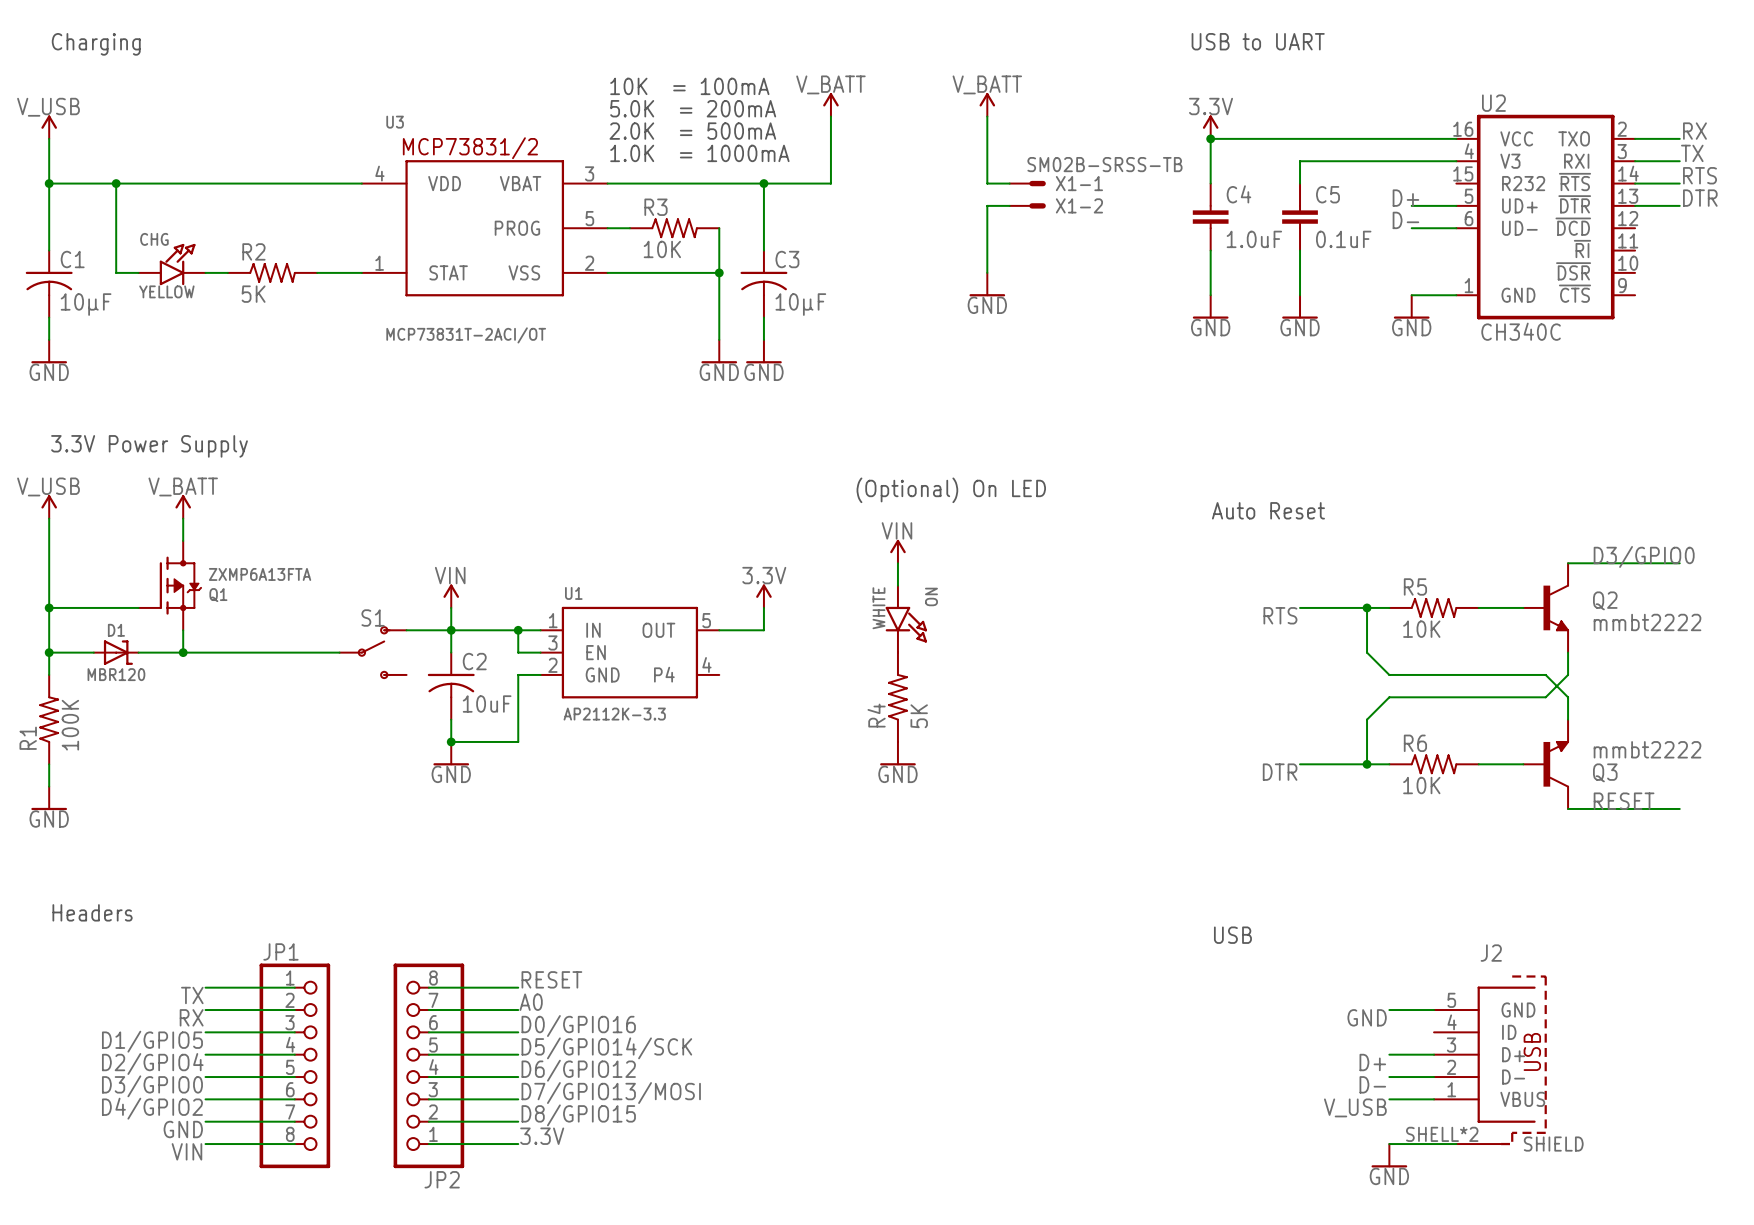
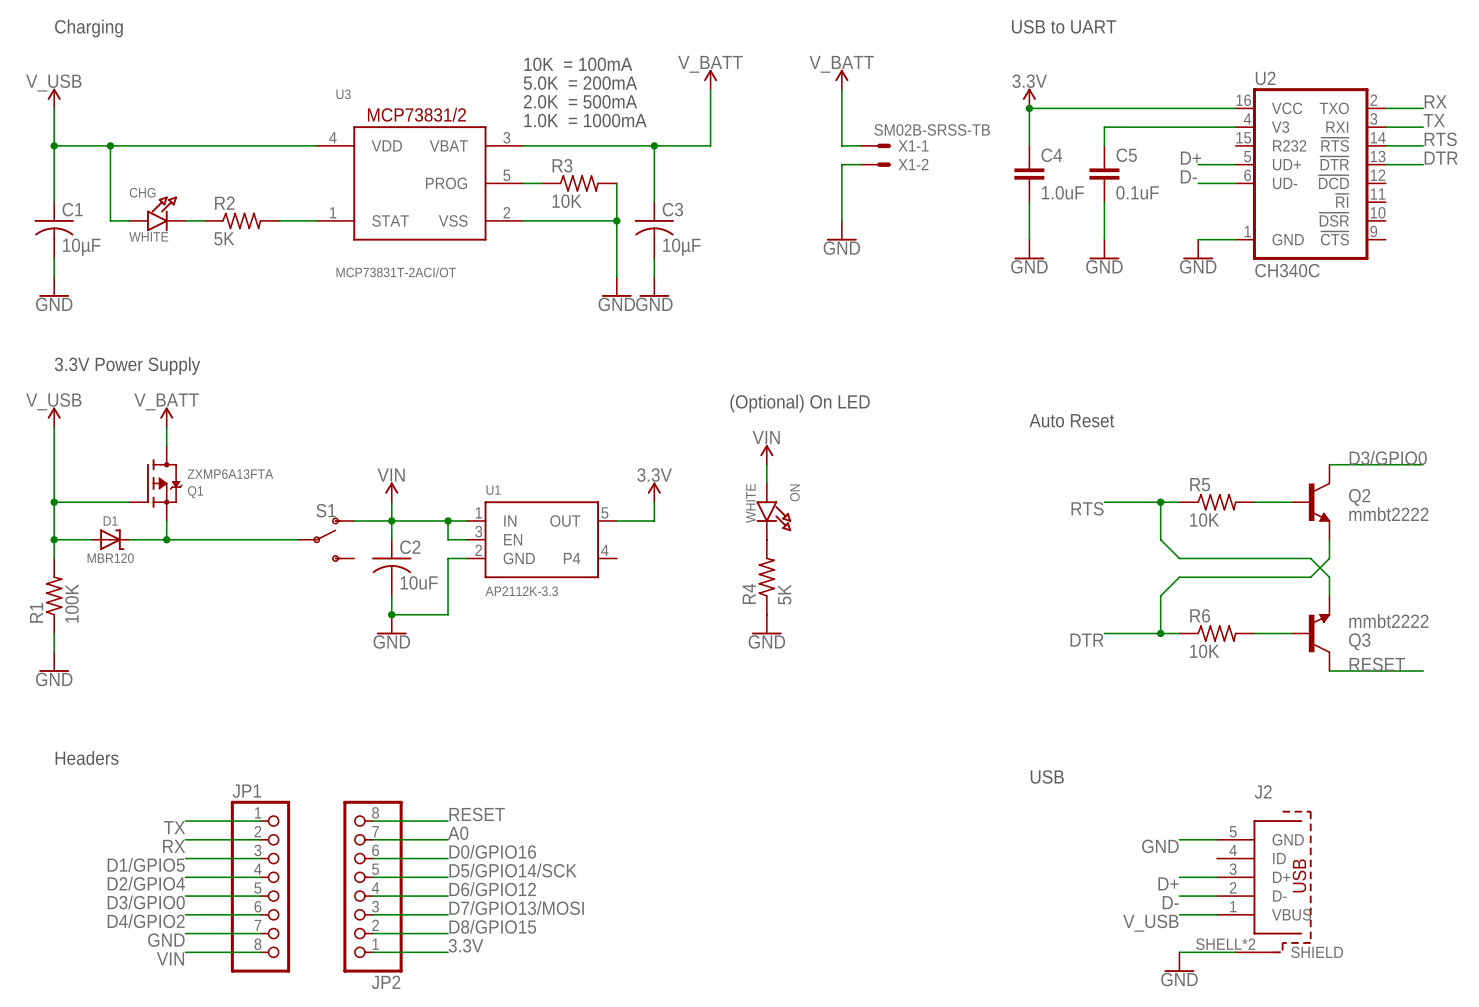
CHG value: YELLOW (166, 291) -> WHITE (148, 236)

